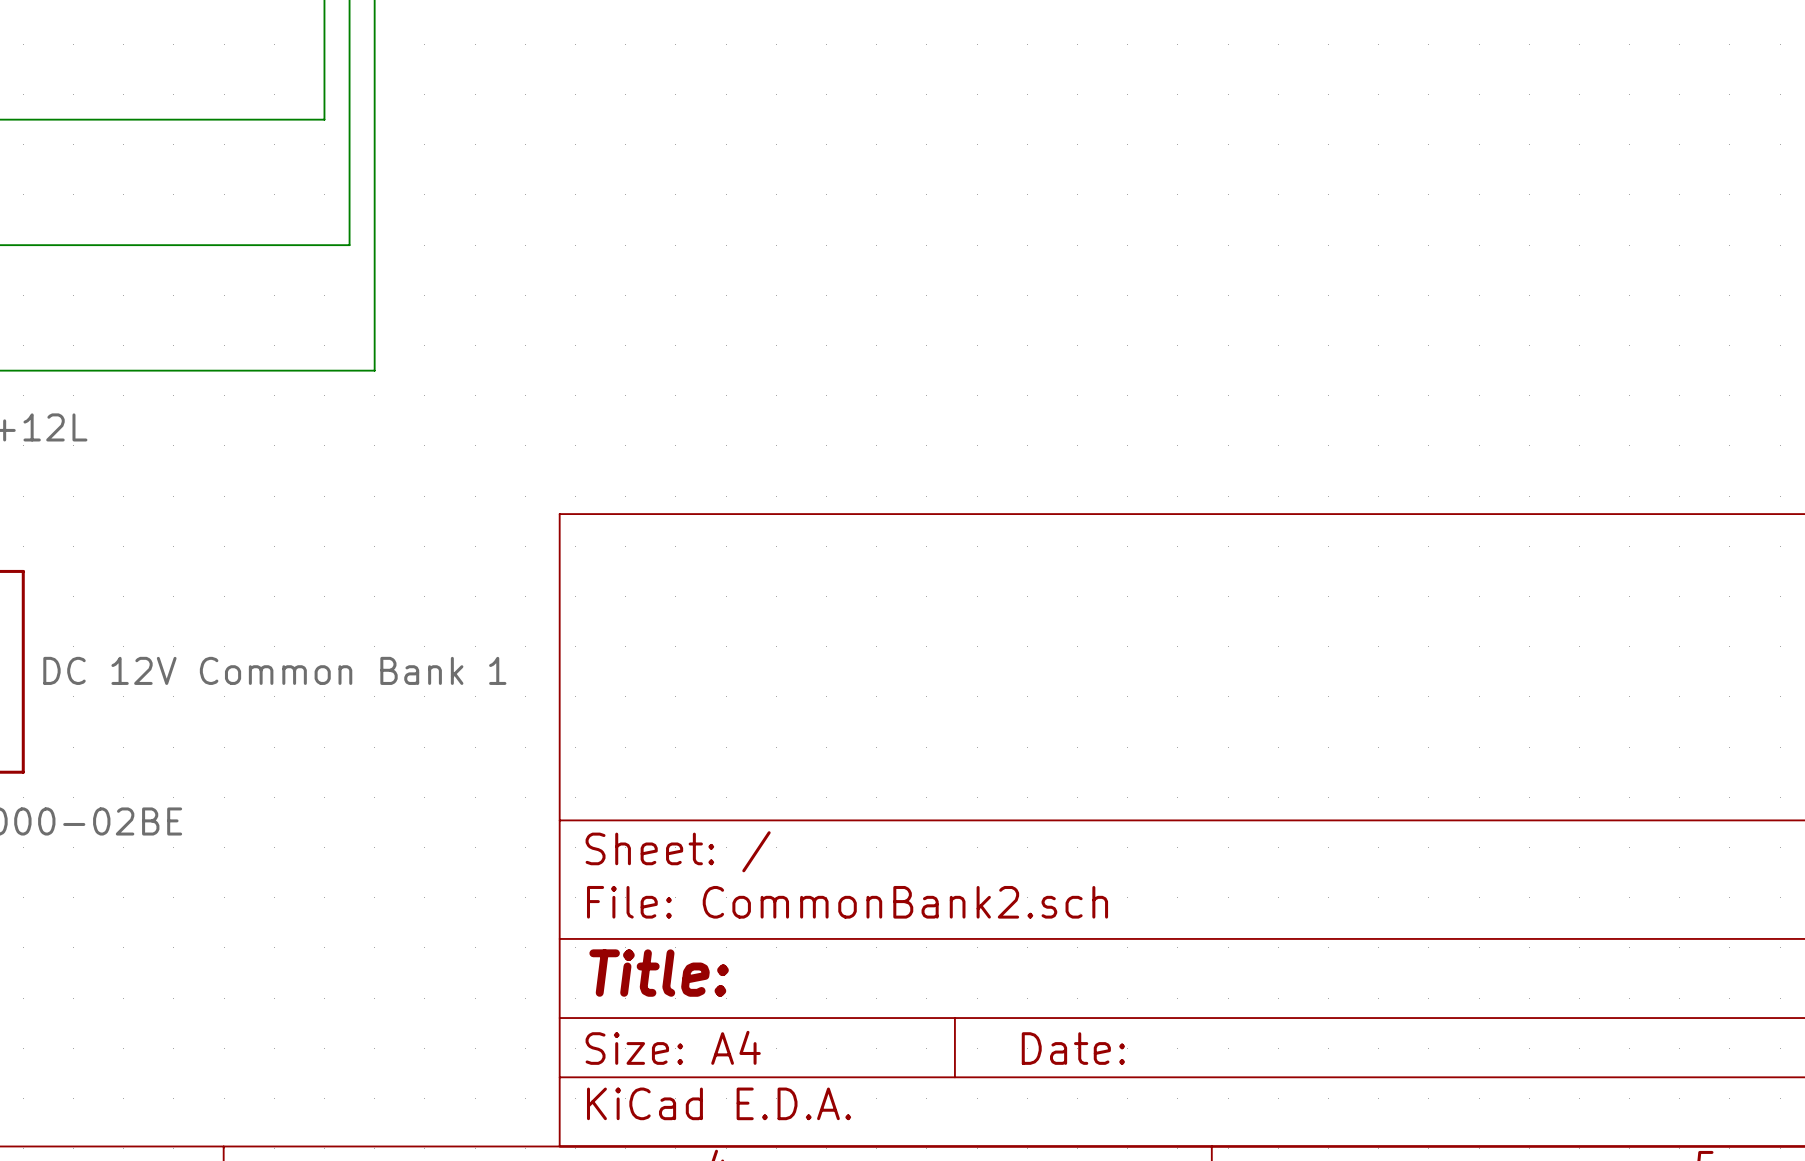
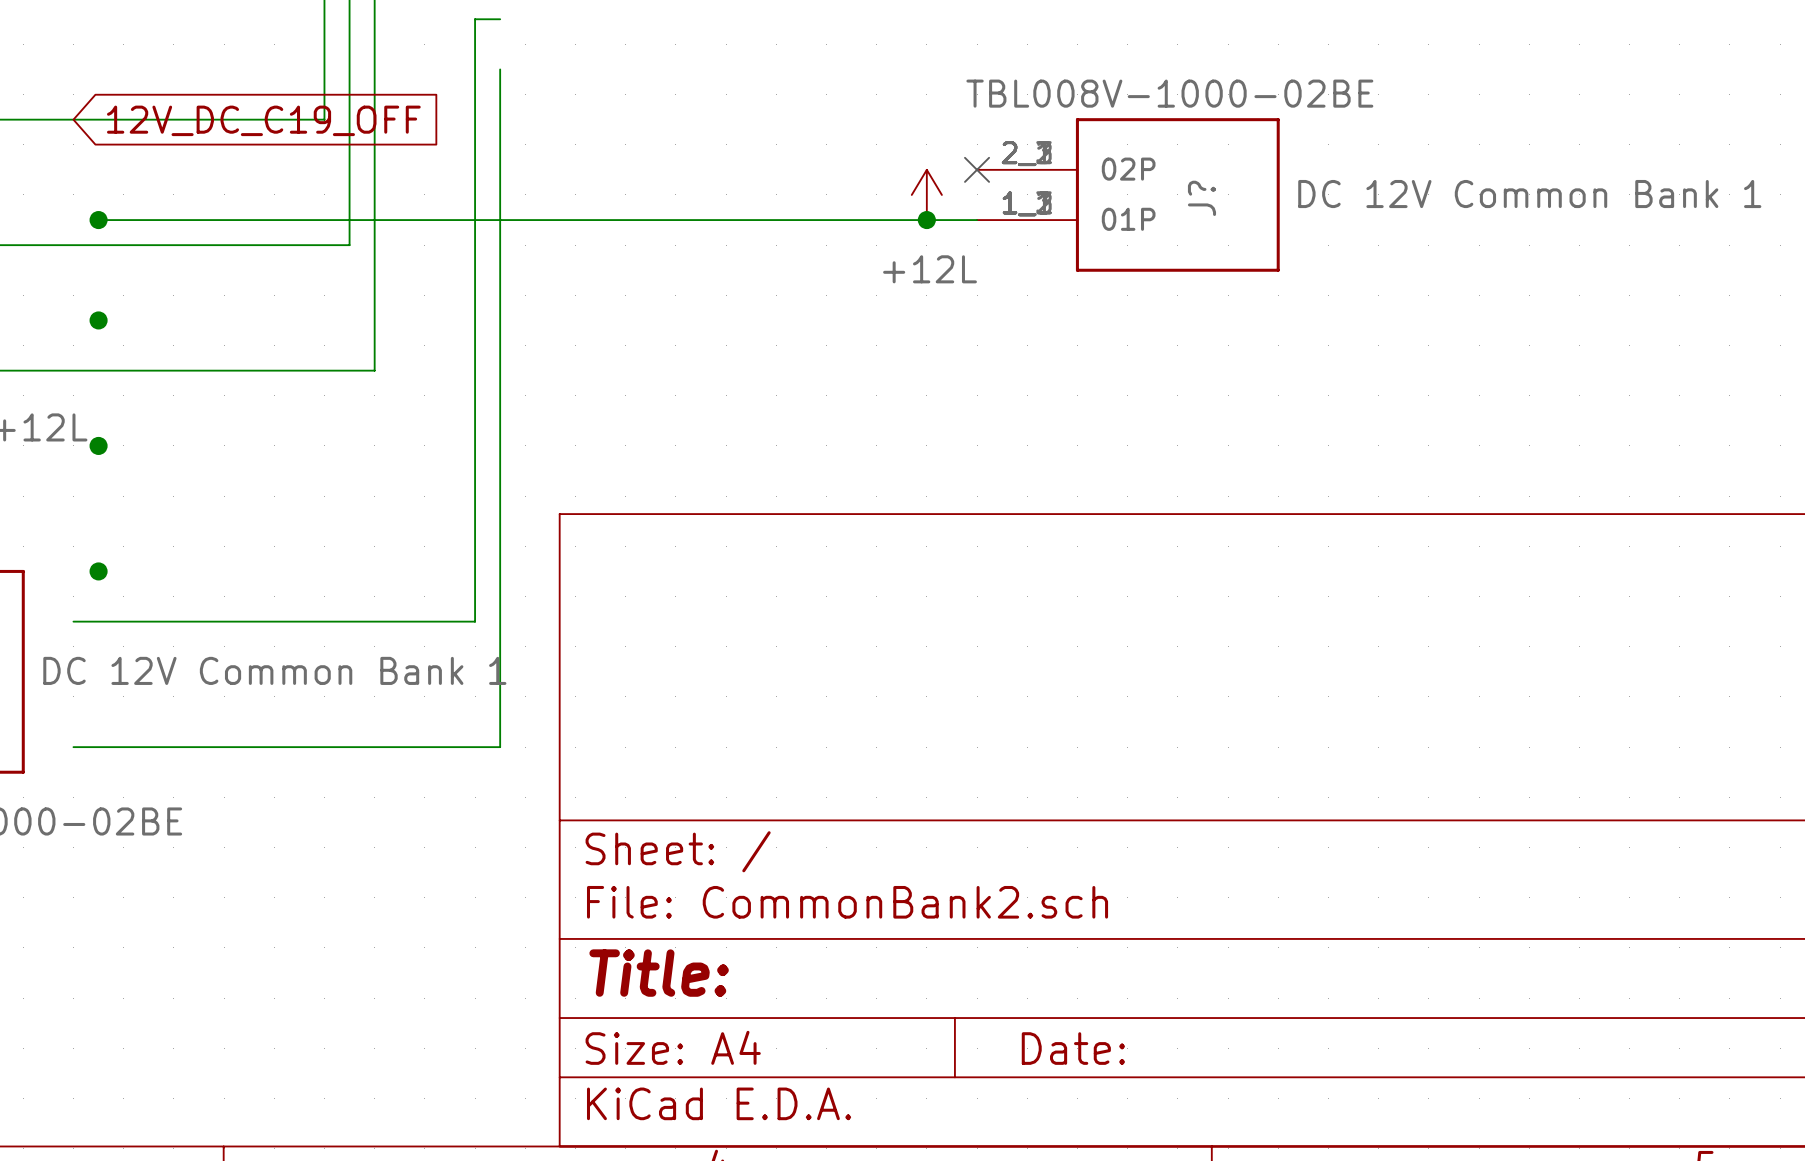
wire: none -> (500, 19) (475, 19) (475, 621) (73, 621)
wire: none -> (500, 69) (500, 747) (73, 747)
global label: none -> 12V_DC_C19_OFF (263, 120)
no-connect mark: none -> (977, 169)
power symbol: none -> +12L (926, 194)
J?: none -> TBL008V-1000-02BE (1128, 194)
wire: none -> (98, 220) (977, 220)
junction: none -> (98, 220)
junction: none -> (926, 220)
junction: none -> (98, 320)
junction: none -> (98, 445)
junction: none -> (98, 571)

